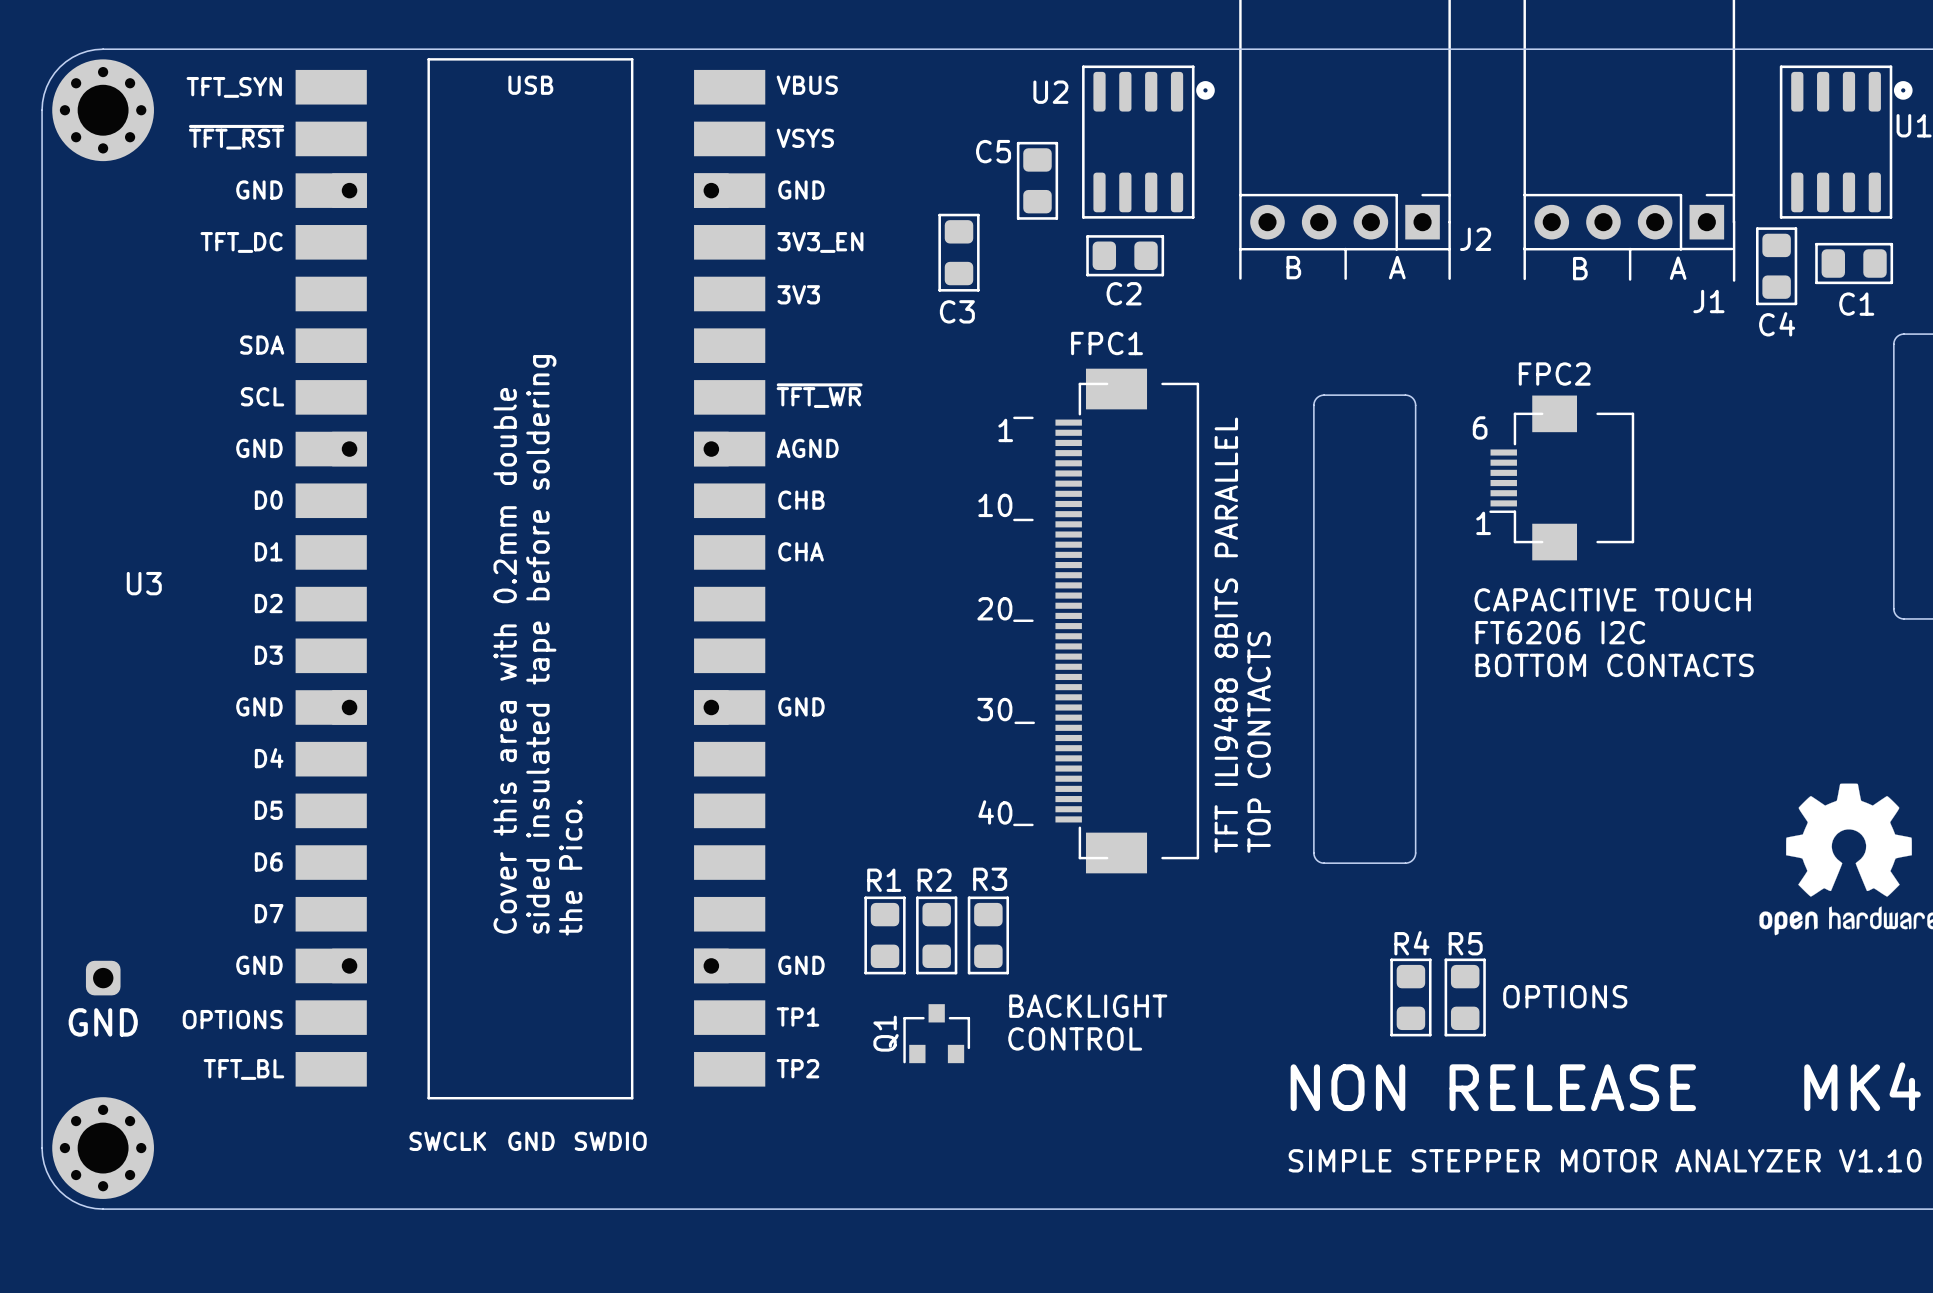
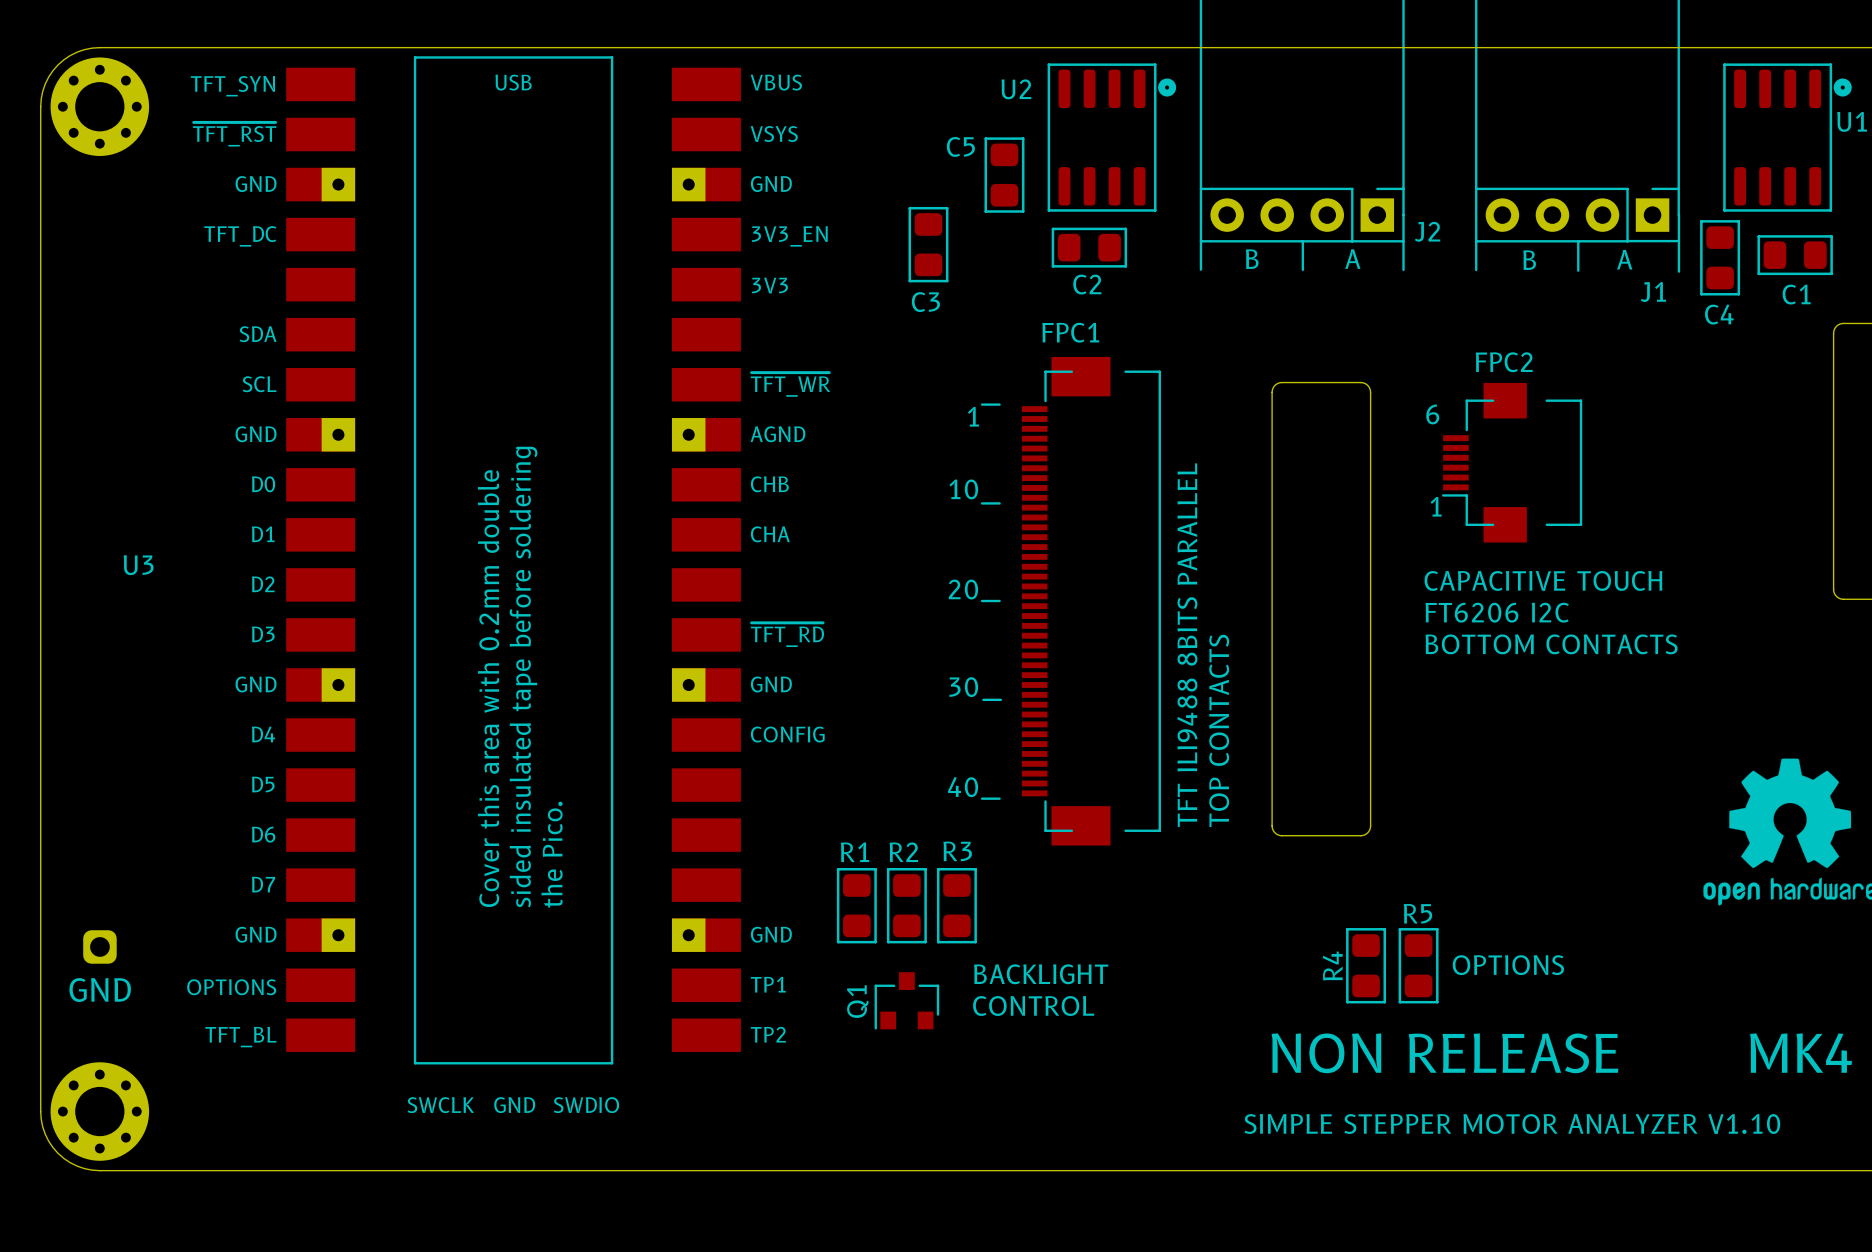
U3 footprint: [295, 58, 766, 1100] -> [286, 56, 741, 1065]
R4 name rotation: 0° (1411, 943) -> 90° counterclockwise (1332, 966)
R4 name position: R4 (1411, 943) -> R4 (1332, 966)

